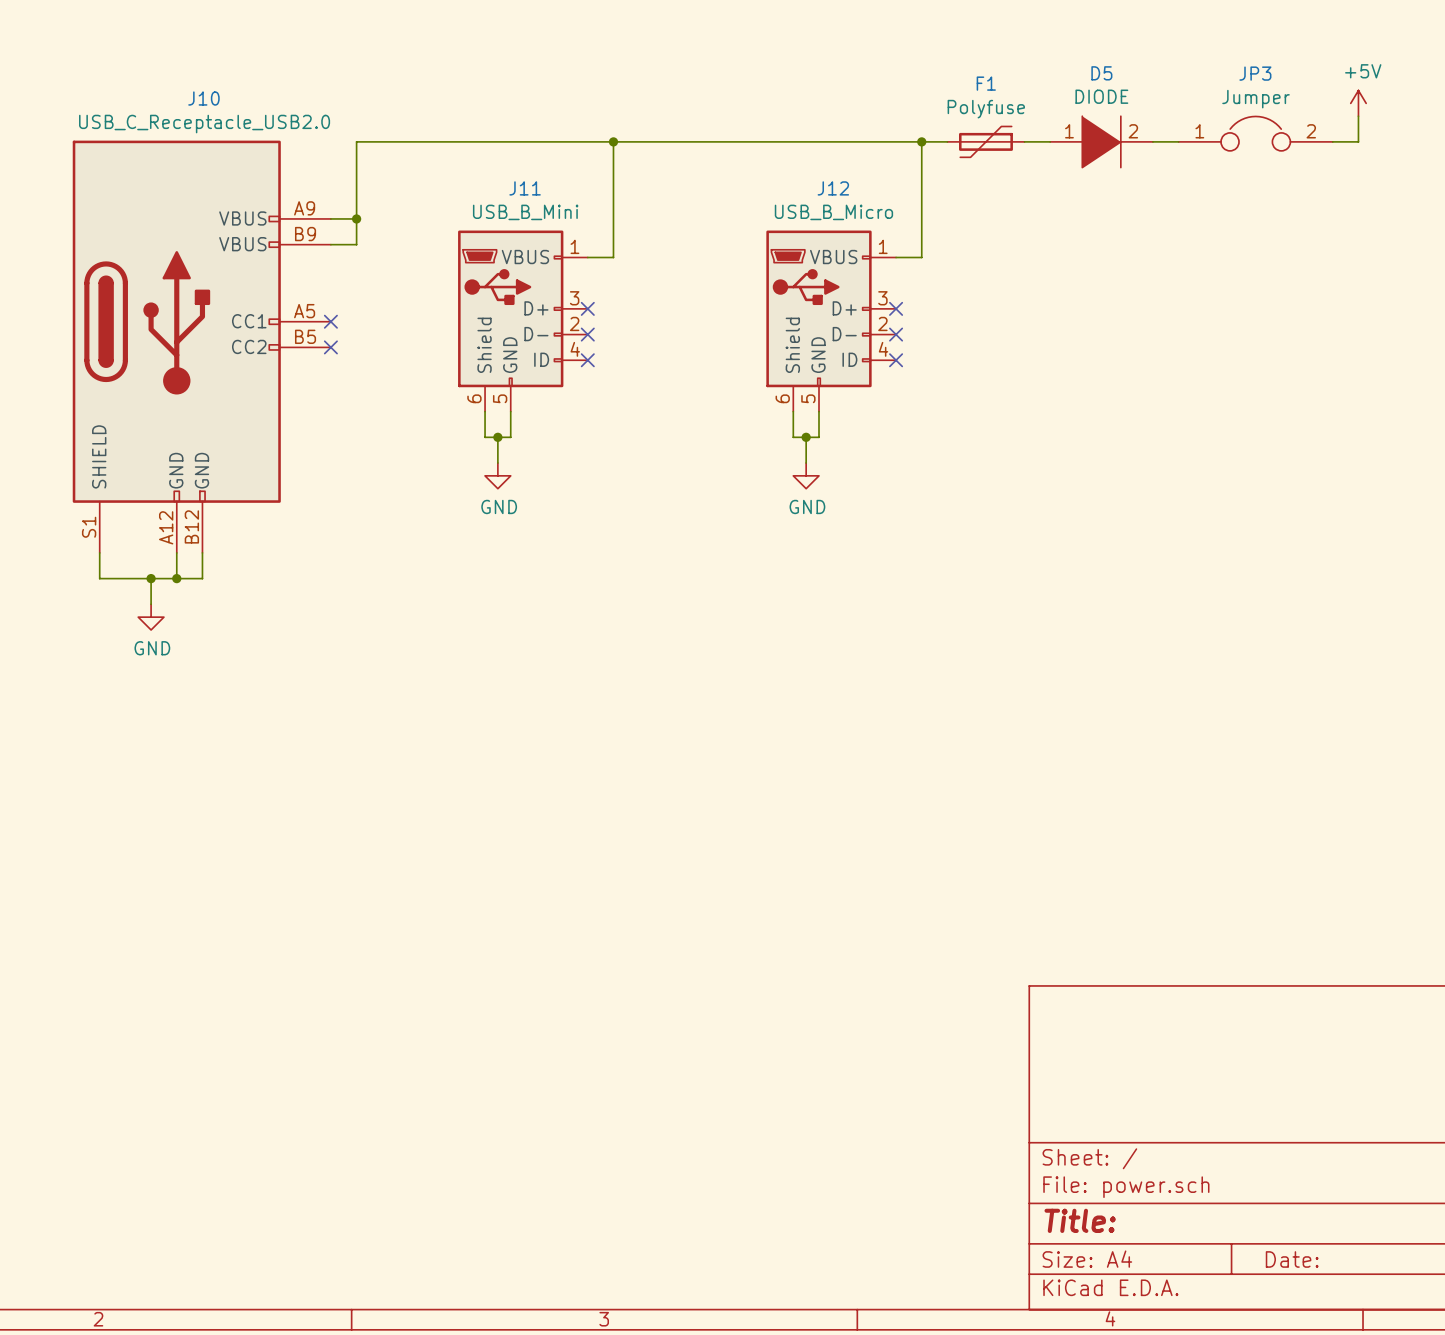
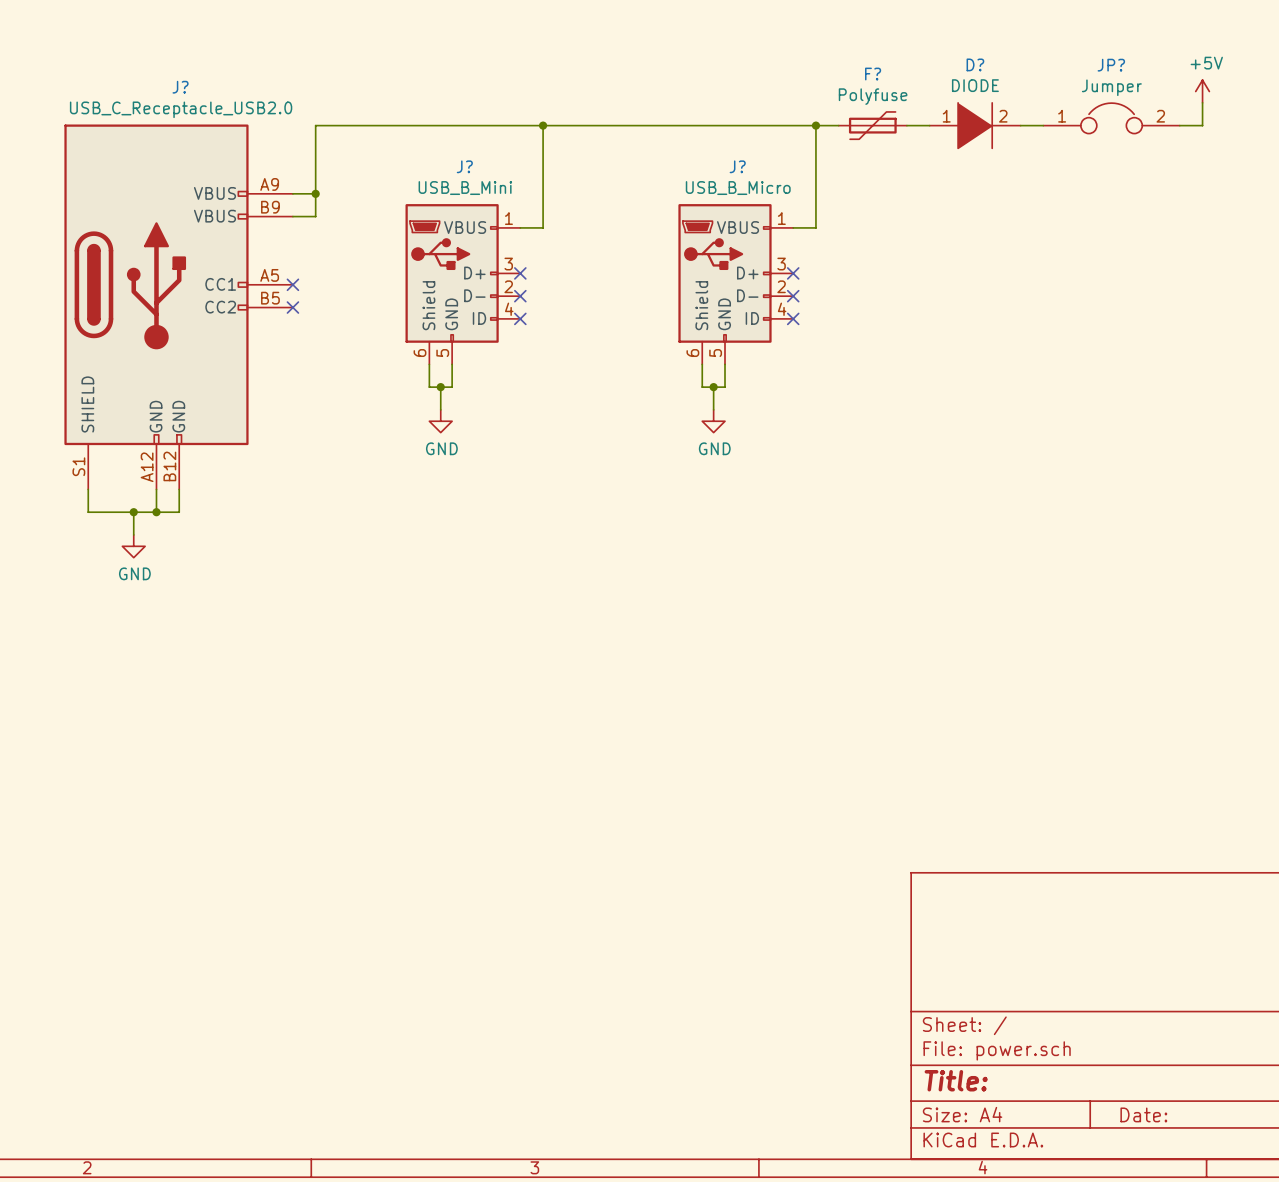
D5 name: D5 (1101, 73) -> D? (975, 64)
JP3 name: JP3 (1255, 73) -> JP? (1111, 65)
F1 name: F1 (986, 83) -> F? (873, 74)
J10 name: J10 (203, 98) -> J? (180, 87)
J11 name: J11 (525, 188) -> J? (464, 166)
J12 name: J12 (833, 188) -> J? (737, 166)

